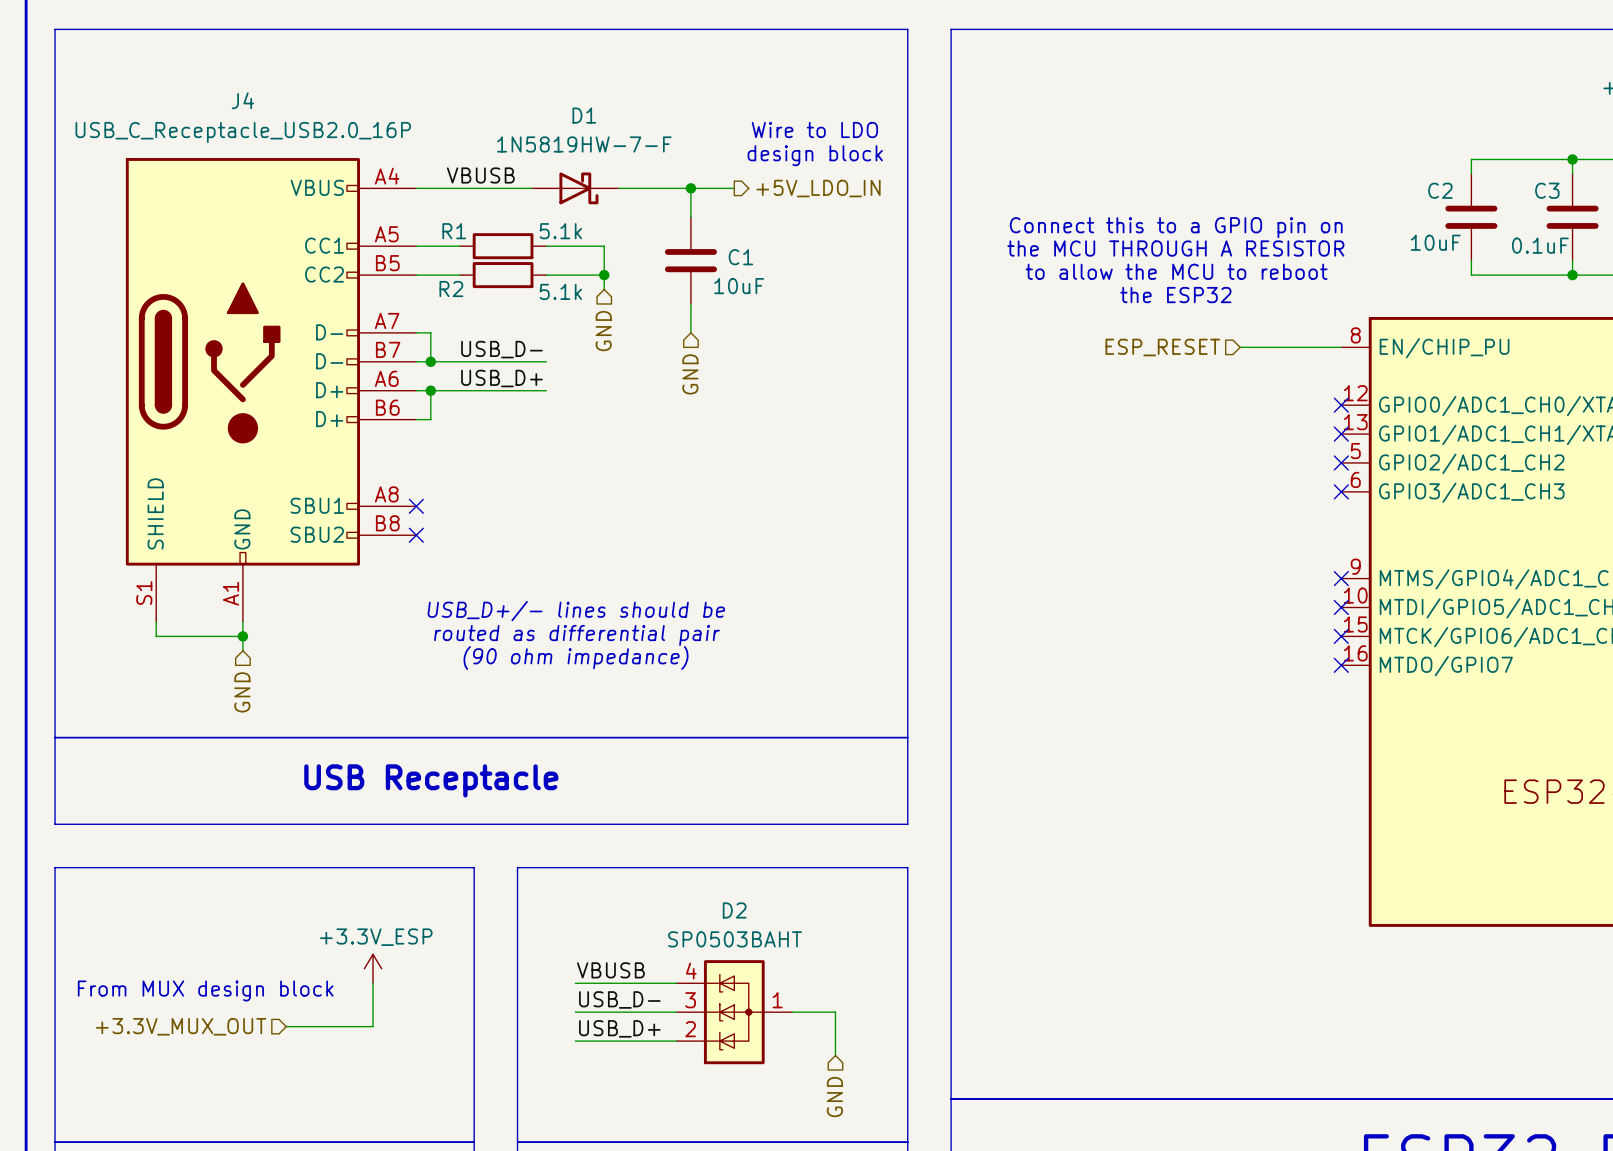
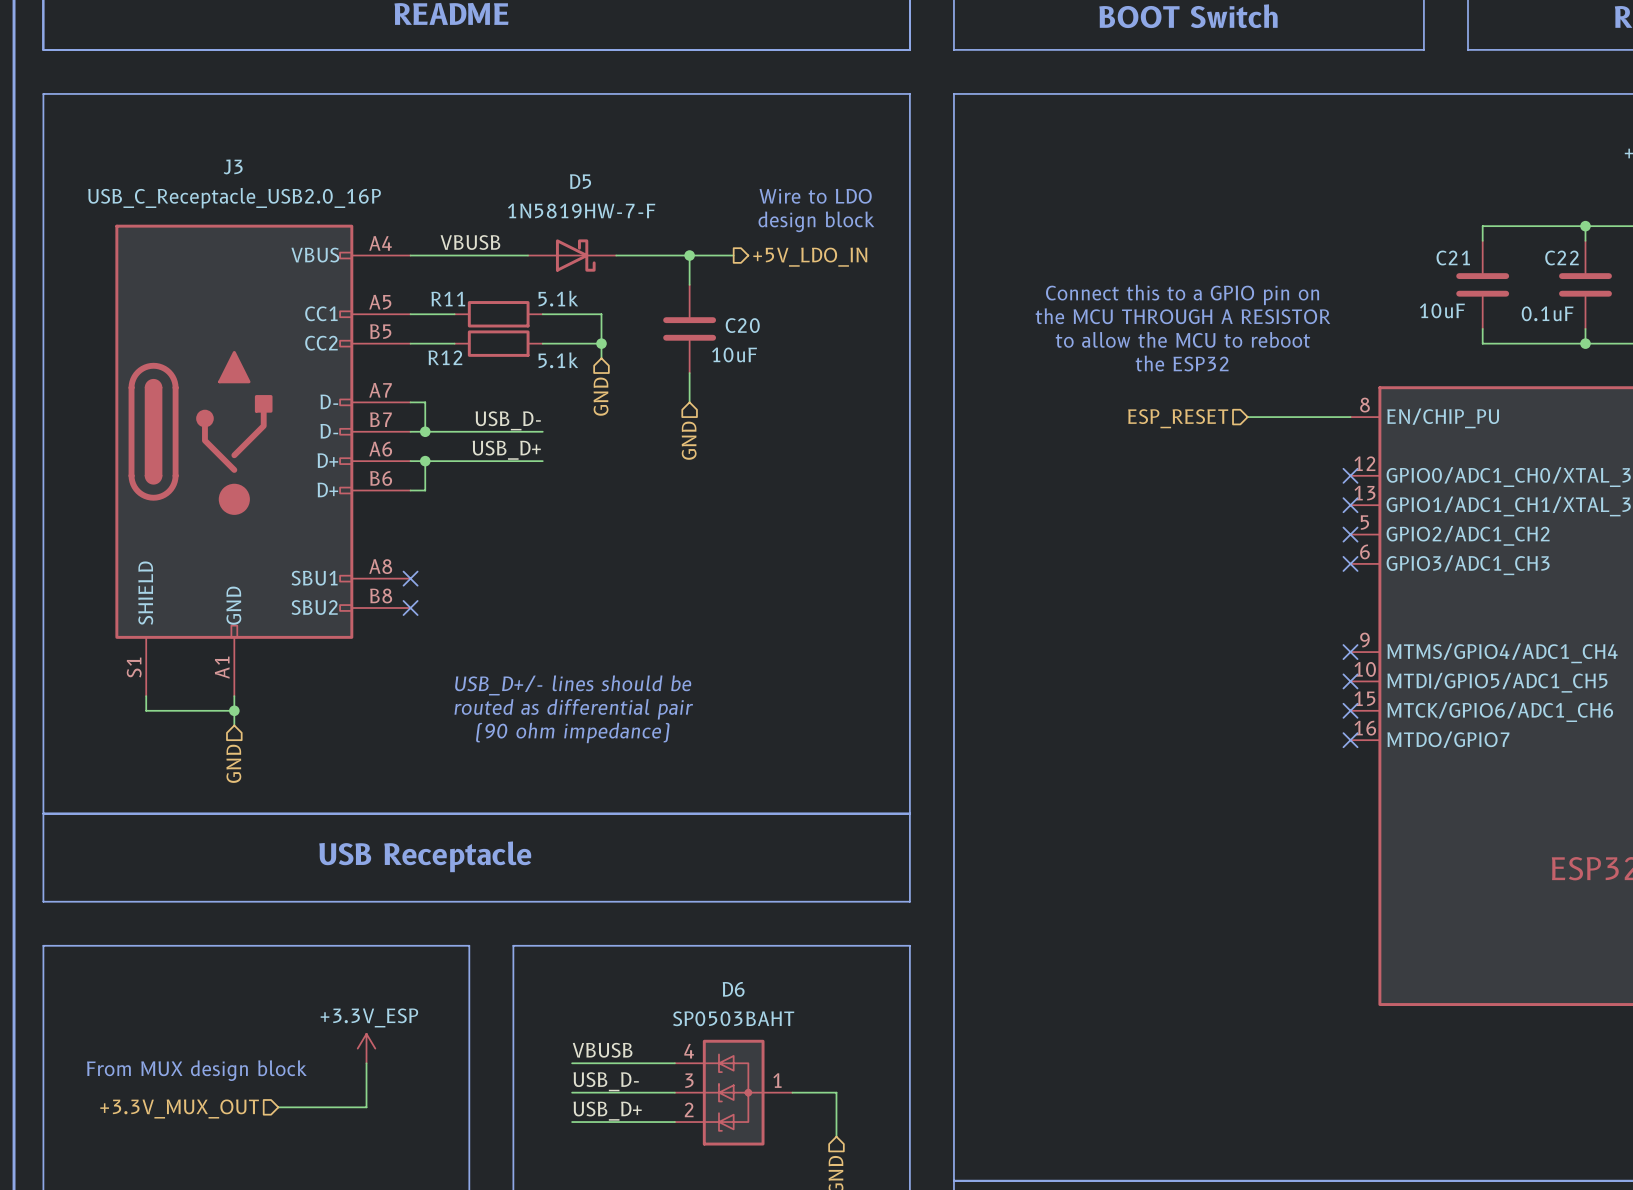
J4 name: J4 (242, 100) -> J3 (233, 166)
D1 name: D1 (584, 115) -> D5 (580, 181)
C2 name: C2 (1440, 190) -> C21 (1453, 257)
C3 name: C3 (1547, 190) -> C22 (1561, 258)
R1 name: R1 (454, 231) -> R11 (448, 299)
C1 name: C1 (740, 257) -> C20 (742, 325)
R2 name: R2 (451, 289) -> R12 (445, 357)
D2 name: D2 (734, 910) -> D6 (733, 989)

